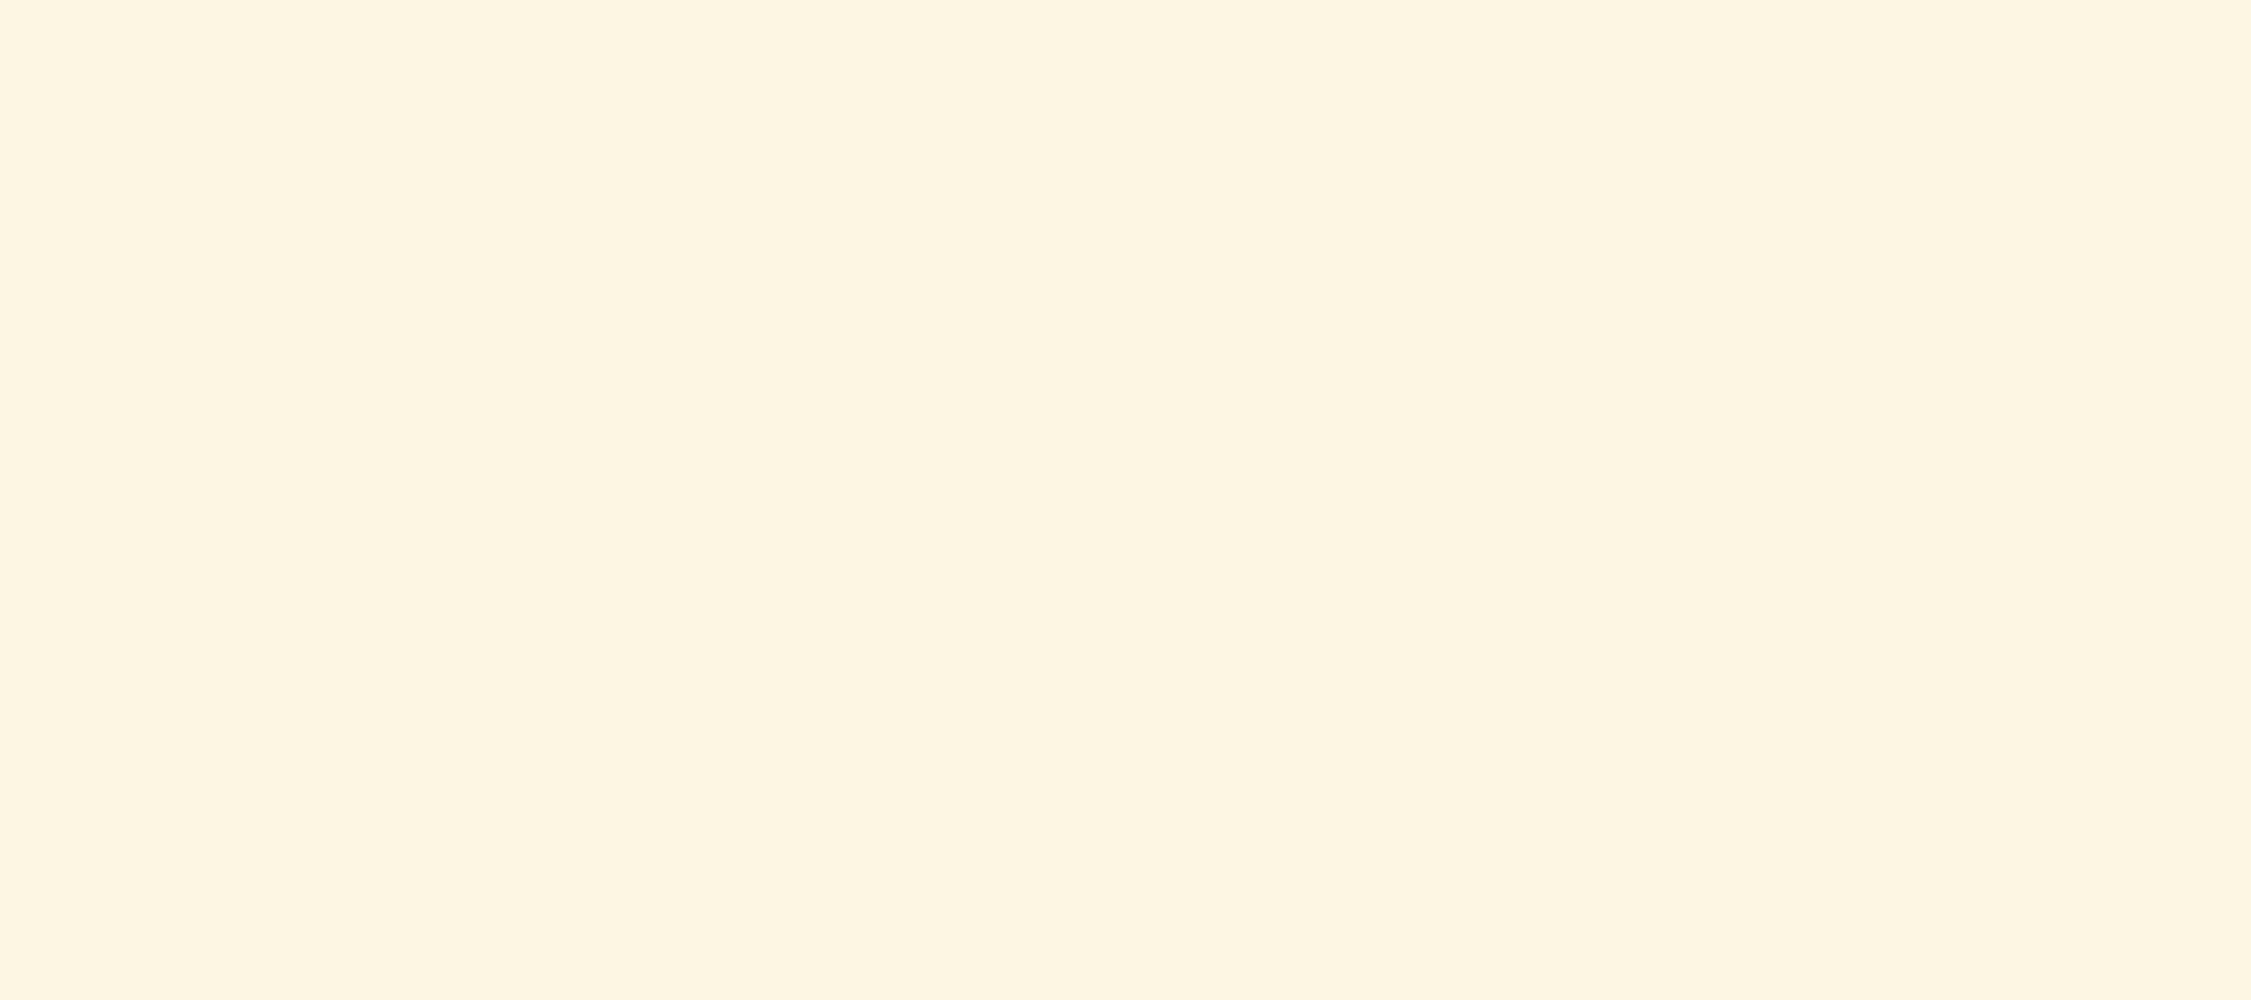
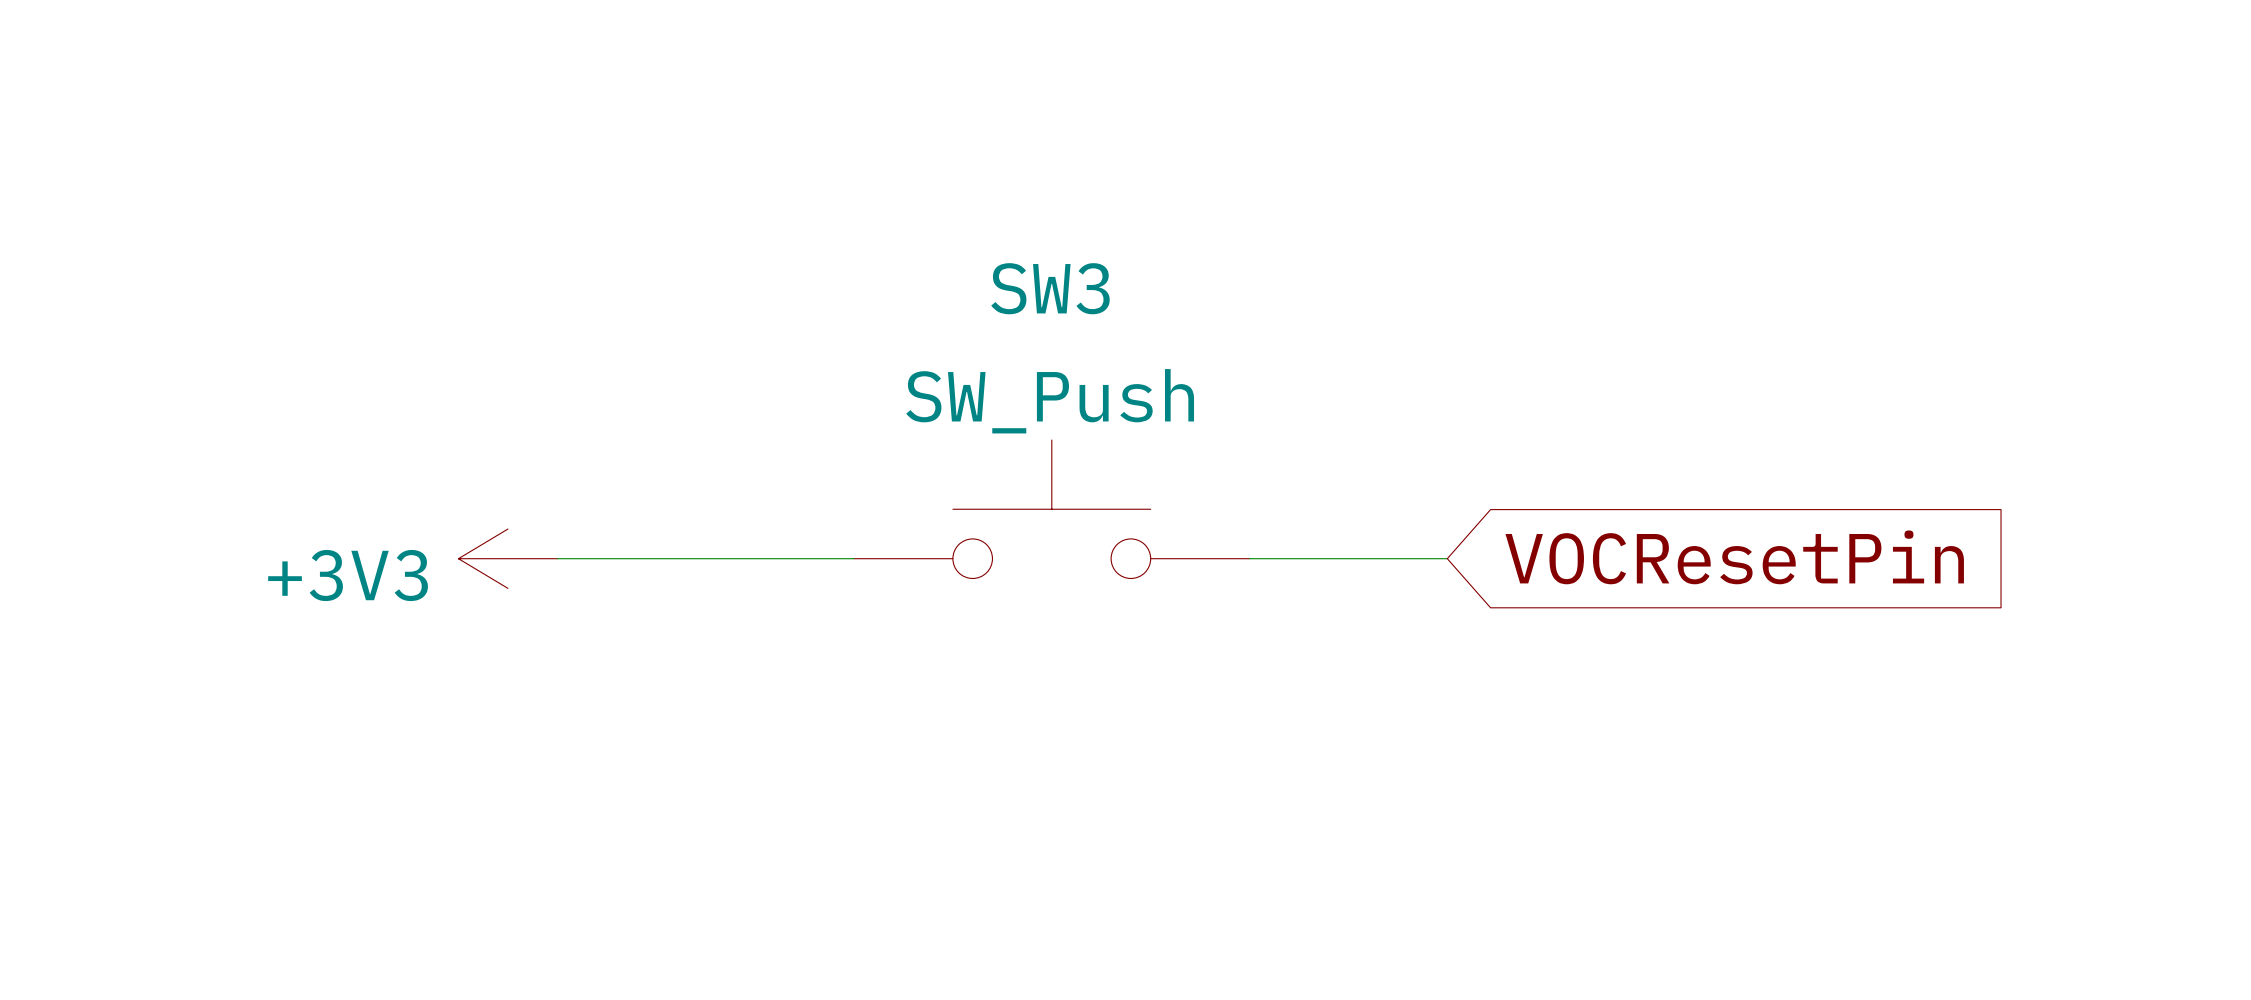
SW3: none -> SW_Push (1051, 509)
power symbol: none -> +3V3 (507, 558)
wire: none -> (557, 558) (854, 558)
wire: none -> (1249, 558) (1447, 558)
global label: none -> VOCResetPin (1734, 557)

